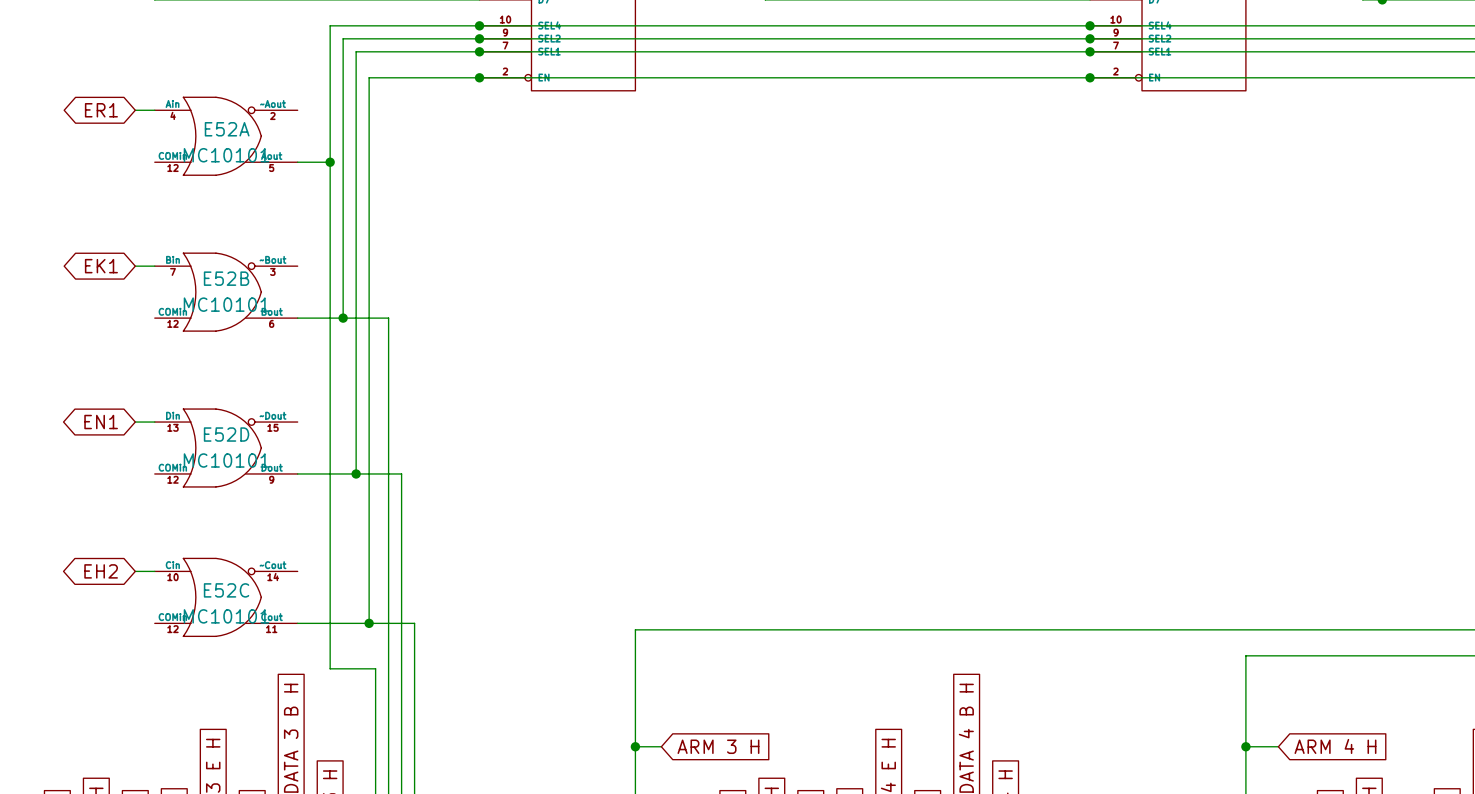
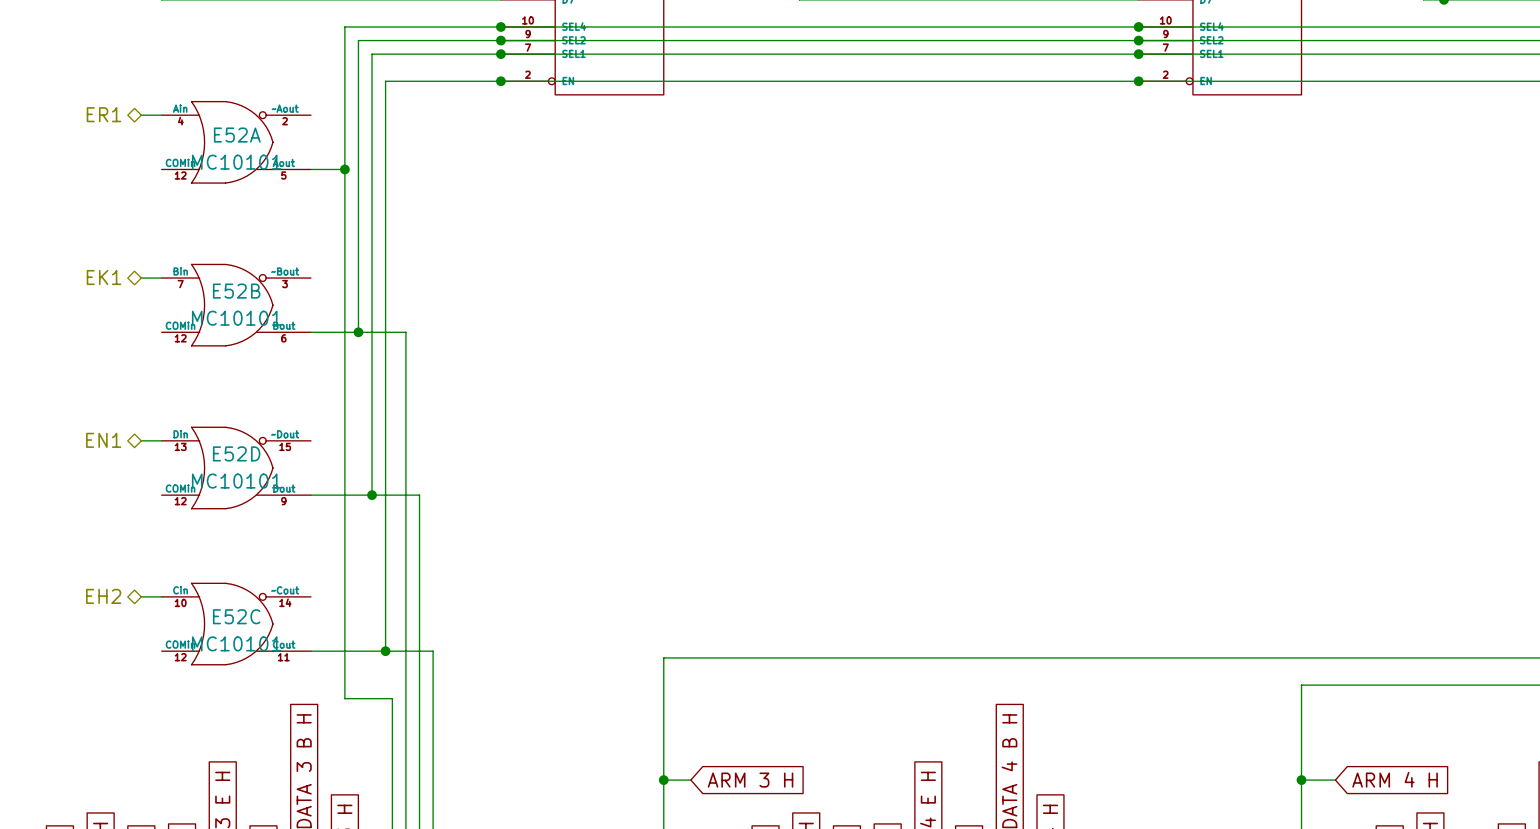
hierarchical label: none -> ER1 (103, 114)
global label: ER1 (101, 110) -> none
hierarchical label: none -> EK1 (103, 277)
global label: EK1 (101, 266) -> none
hierarchical label: none -> EN1 (103, 440)
global label: EN1 (101, 422) -> none
hierarchical label: none -> EH2 (103, 596)
global label: EH2 (101, 571) -> none

